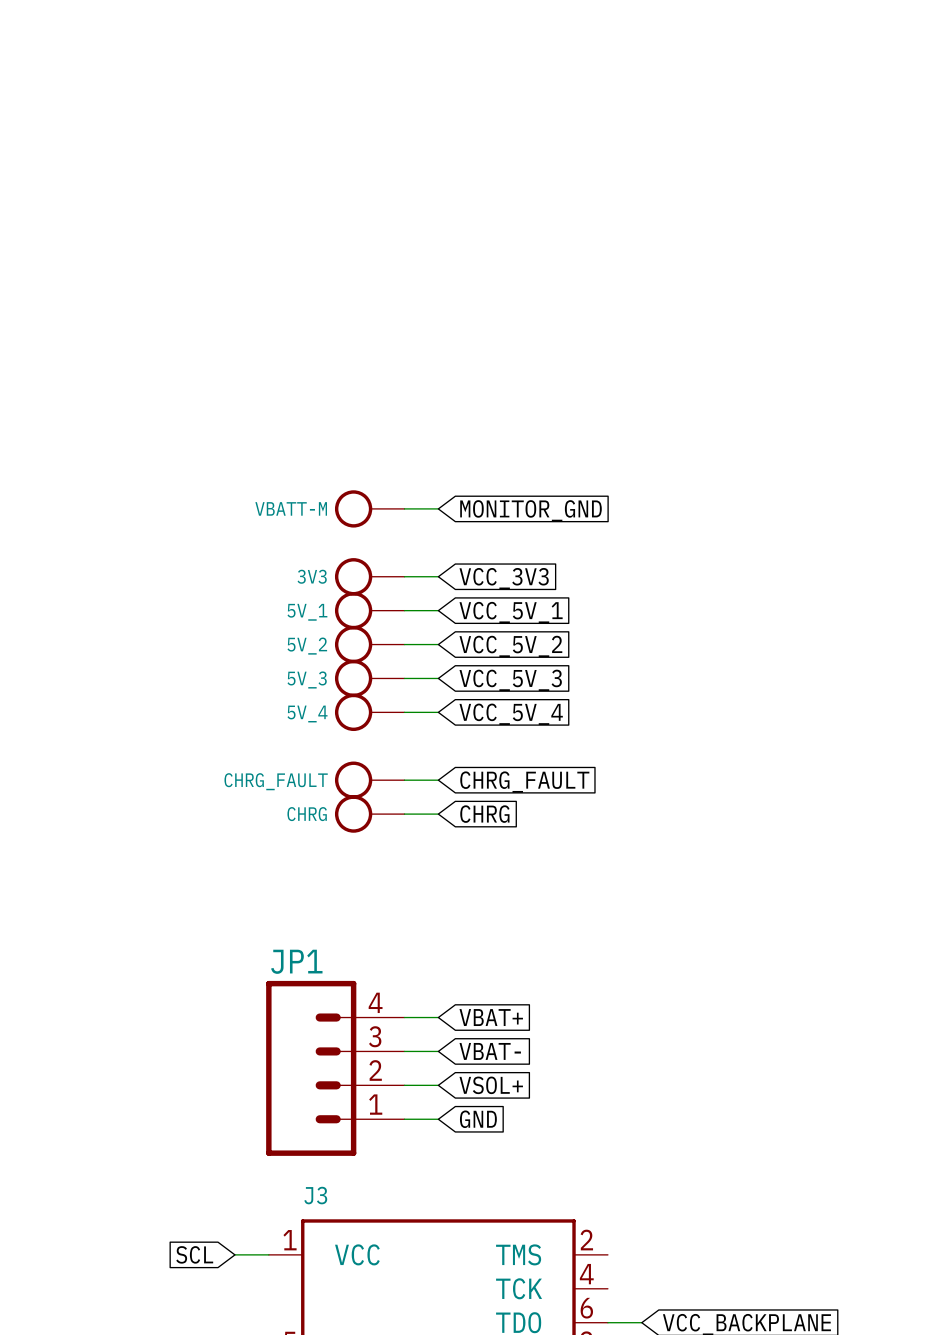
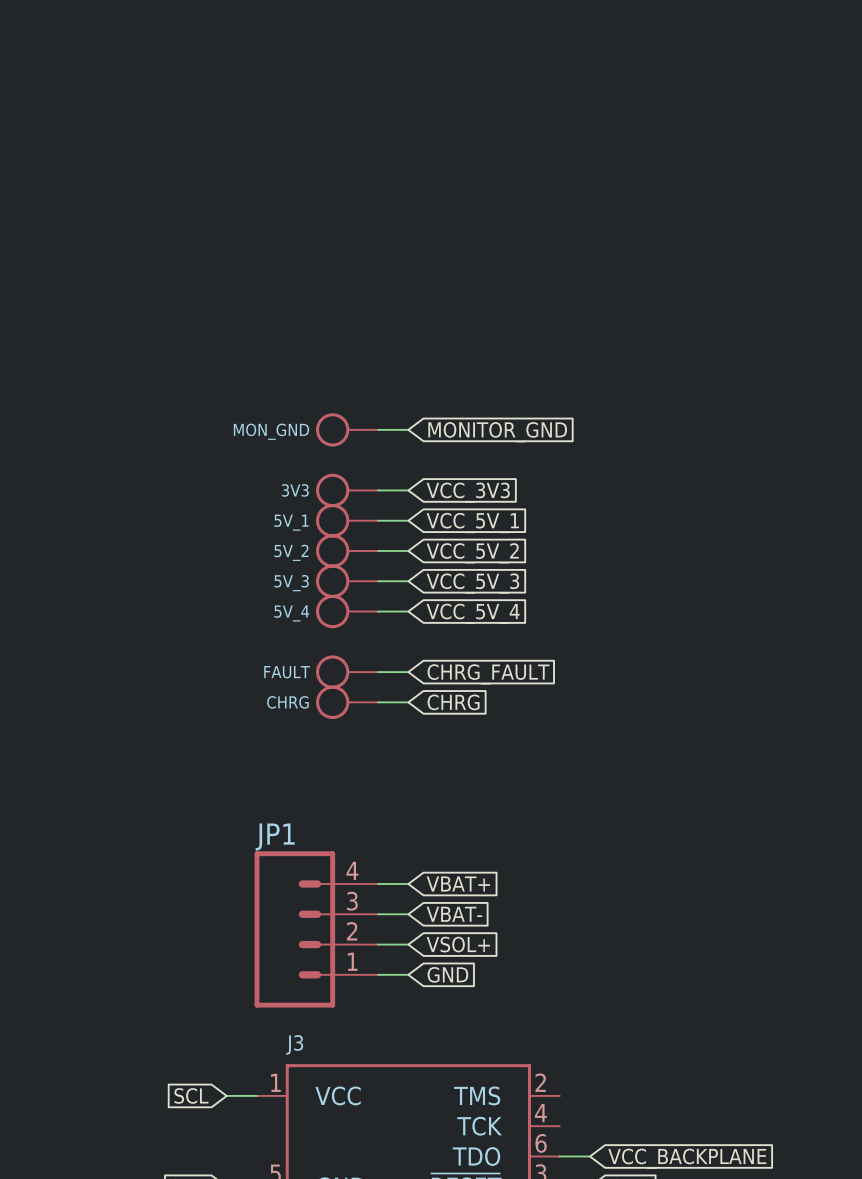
VBATT-M name: VBATT-M (291, 508) -> MON_GND (271, 431)
CHRG_FAULT name: CHRG_FAULT (276, 781) -> FAULT (287, 672)

